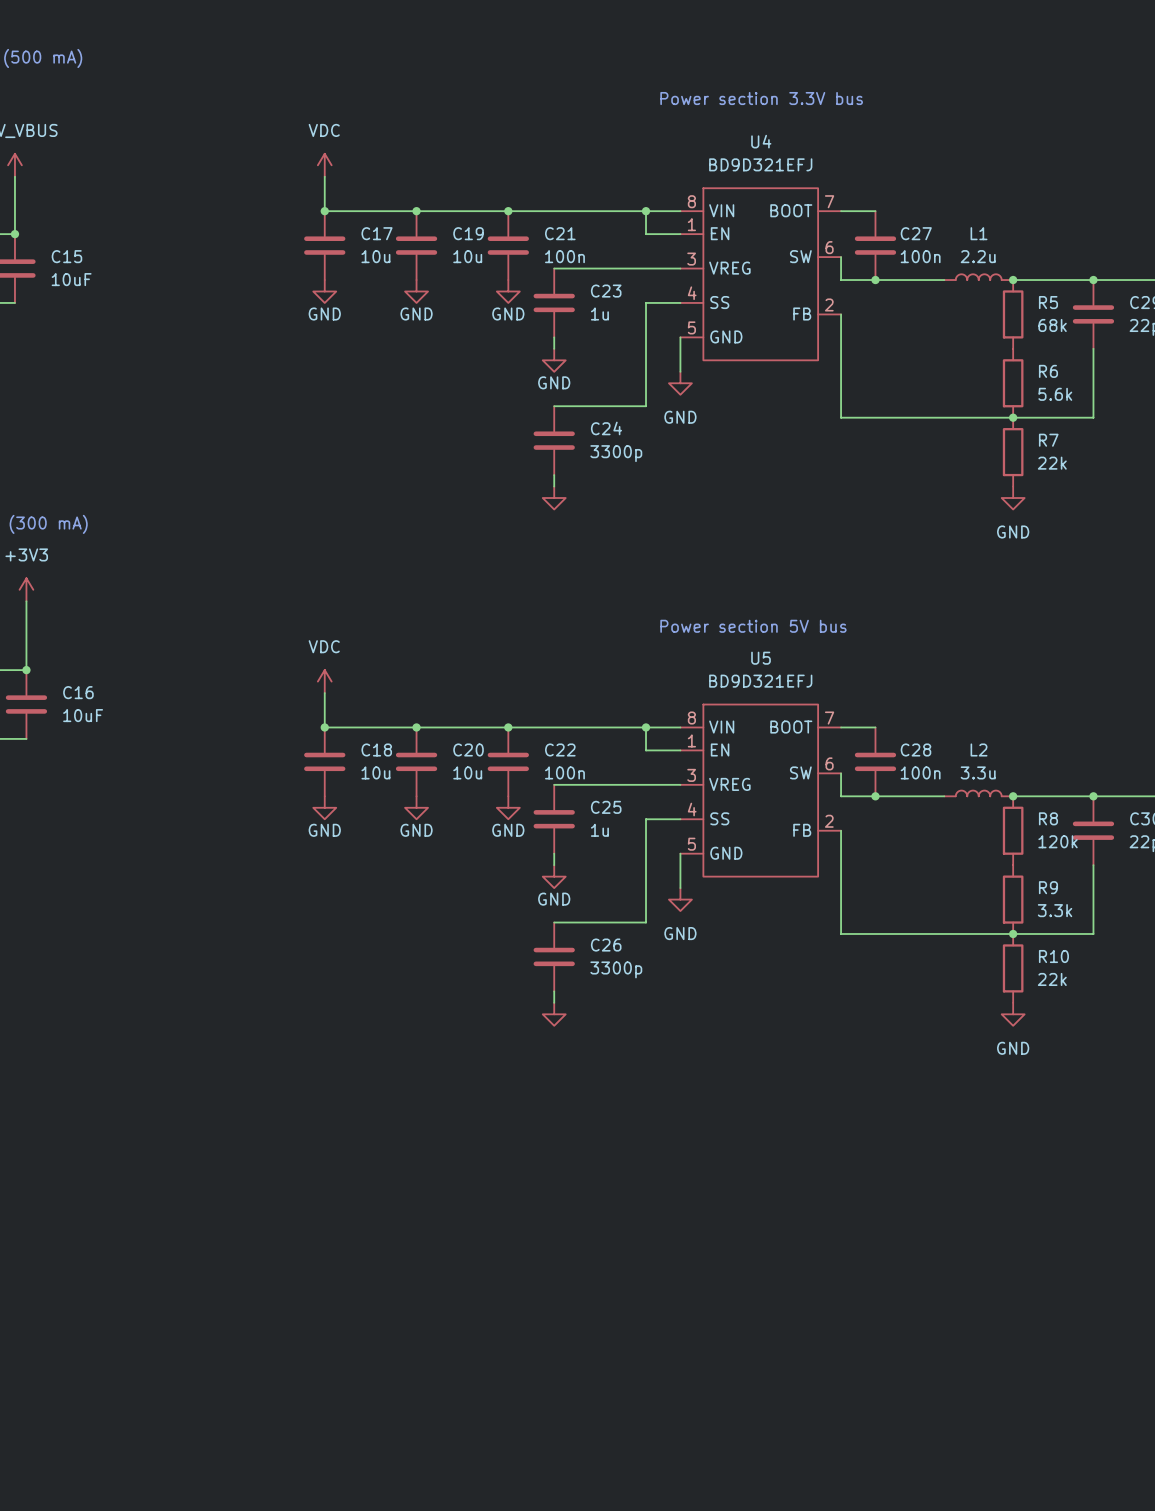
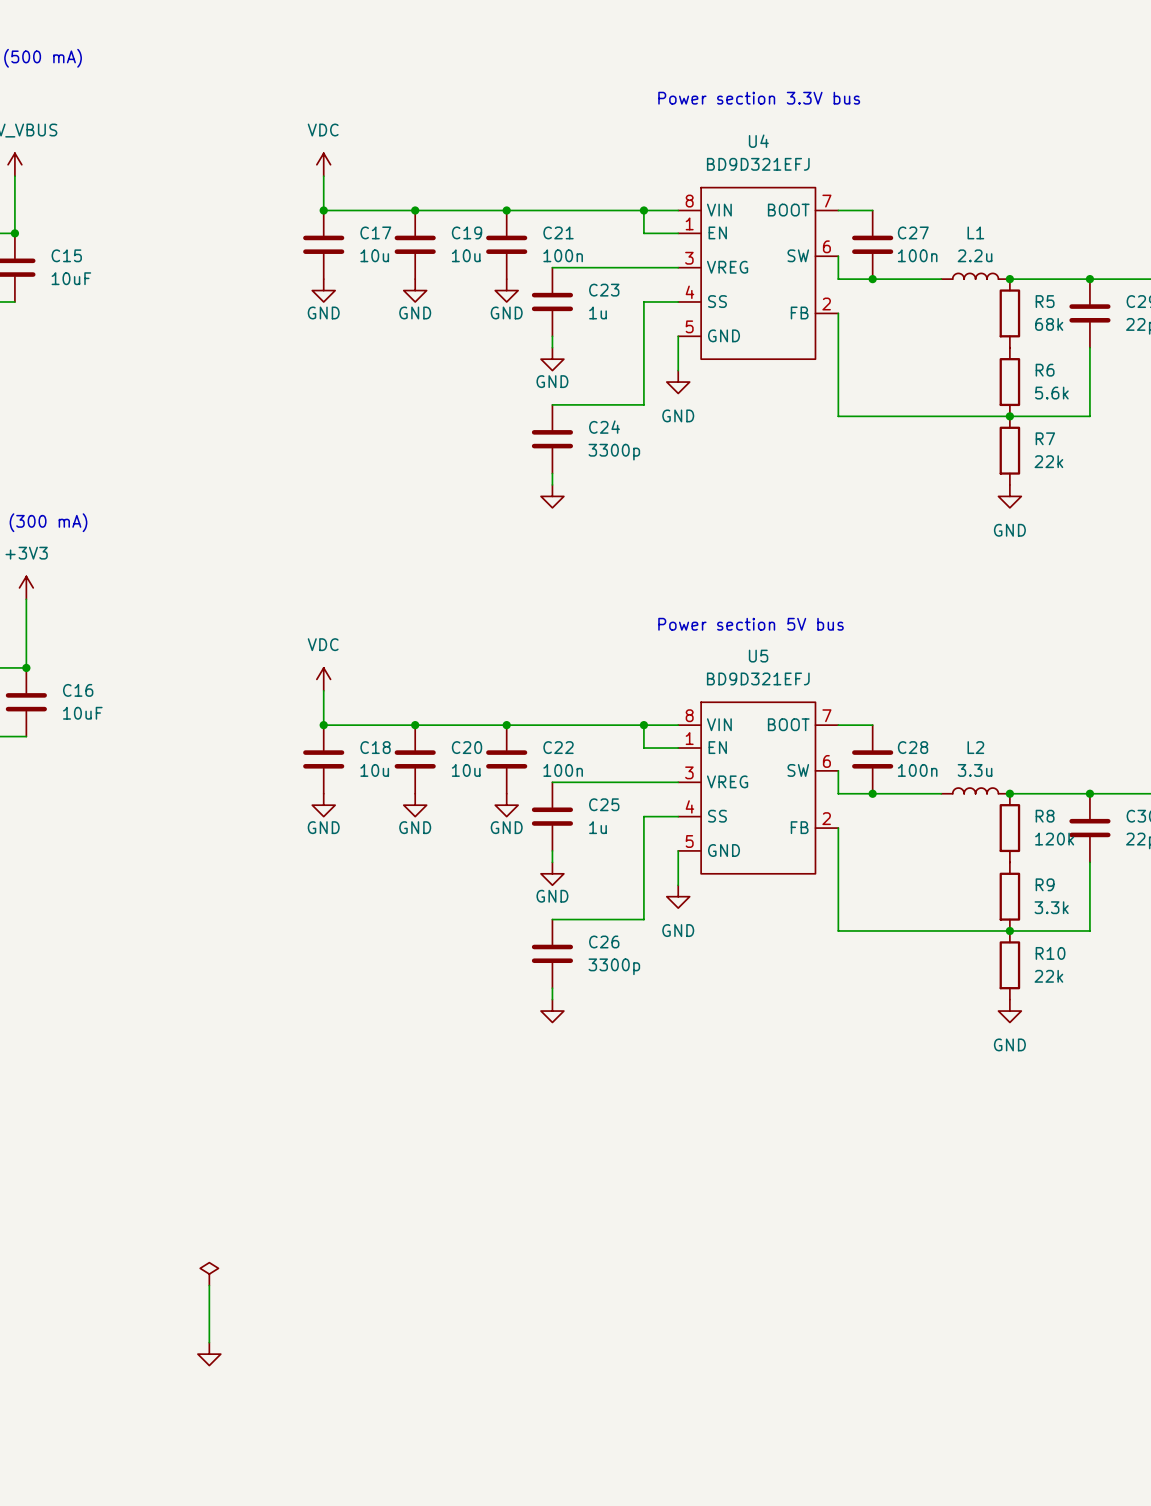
power symbol: none -> (209, 1274)
wire: none -> (209, 1285) (209, 1342)
power symbol: none -> (209, 1354)

